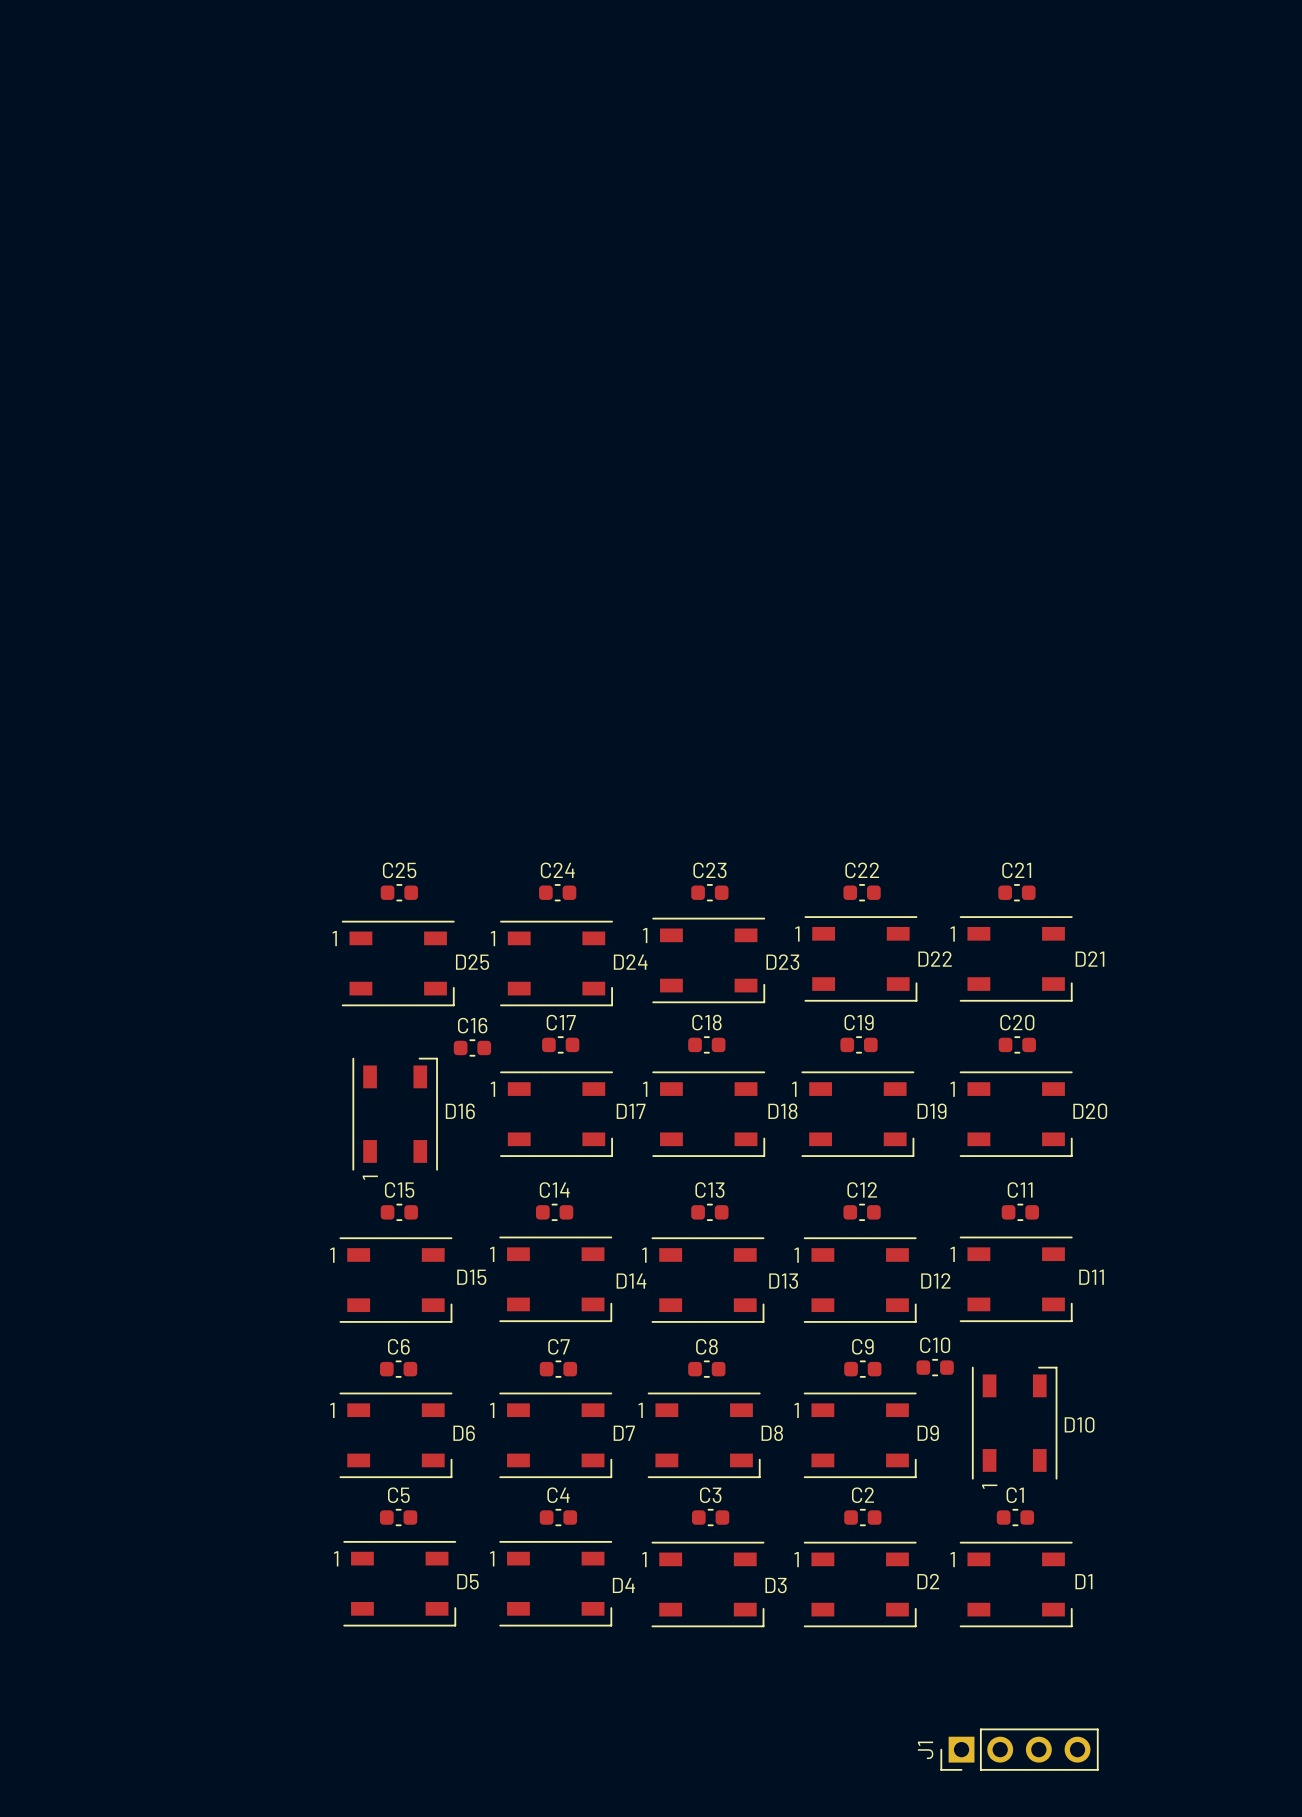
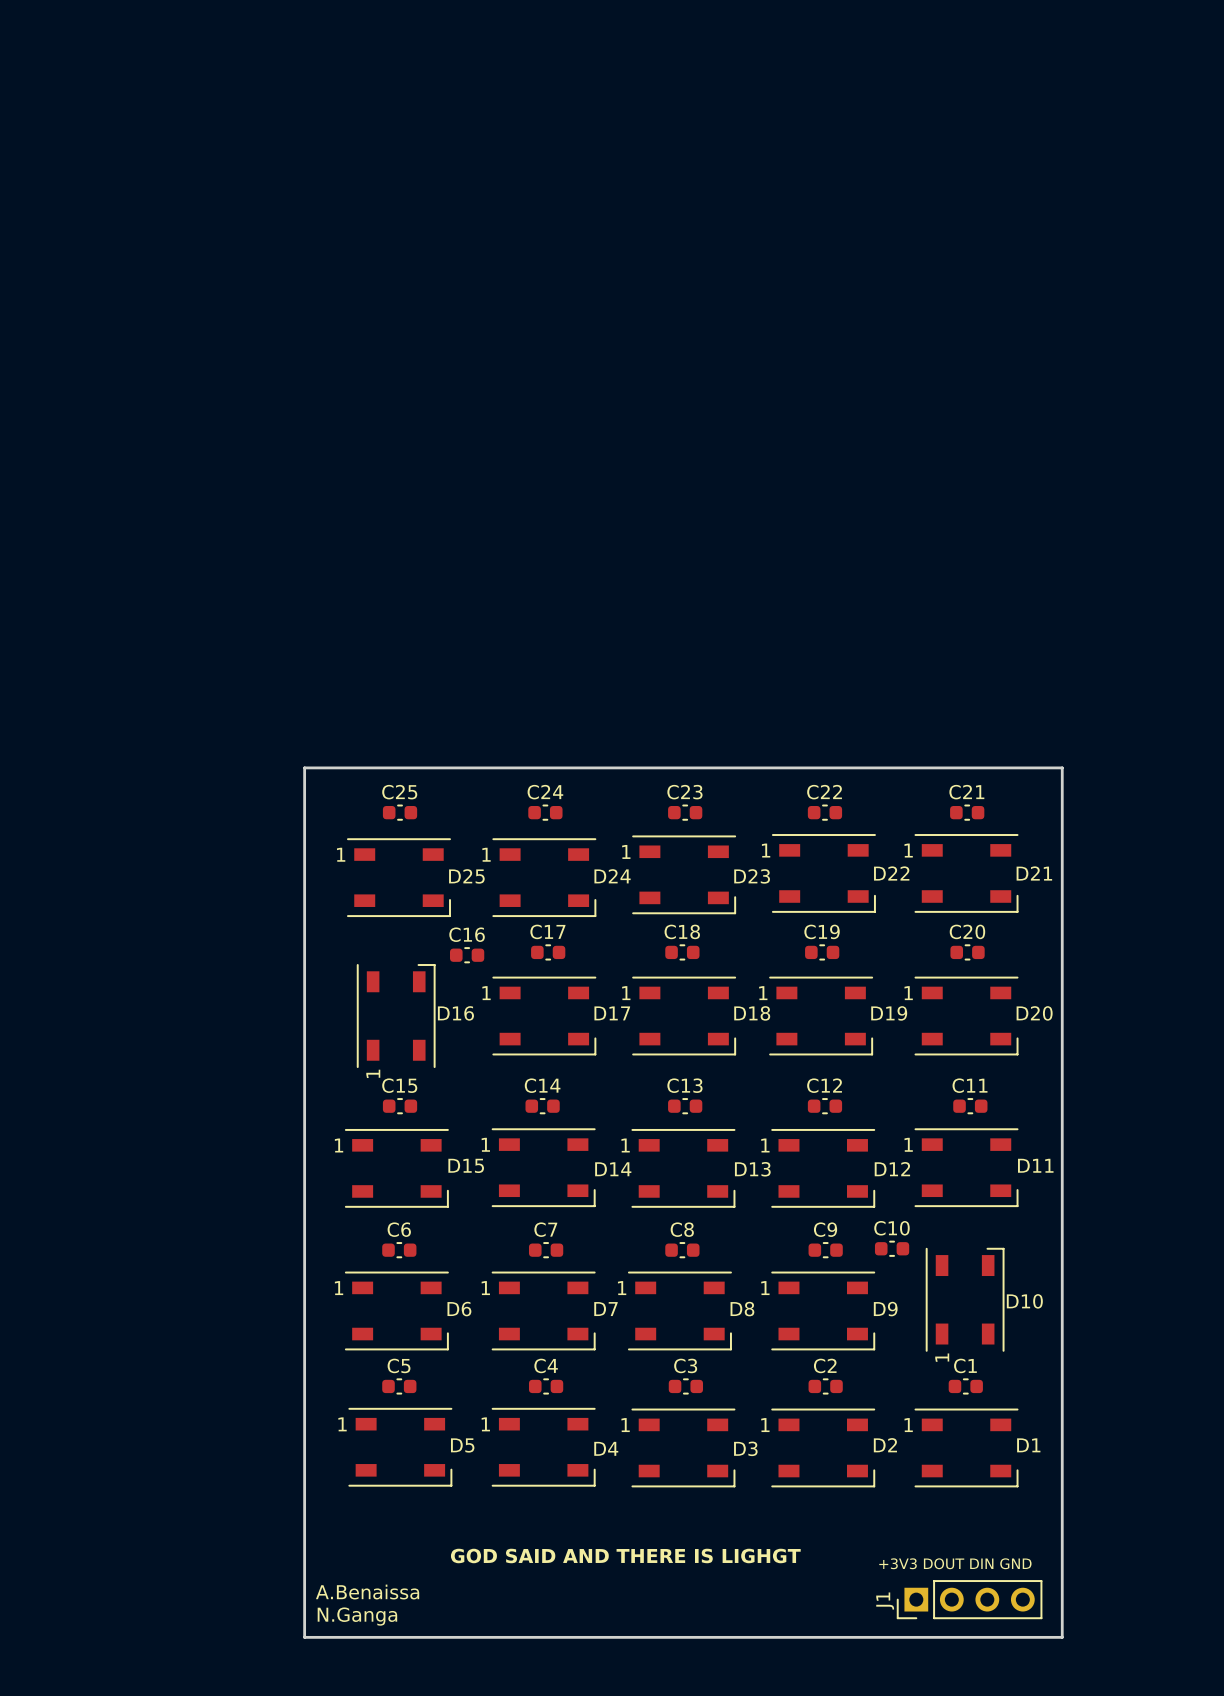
board edge: none -> (304, 767) (304, 1637) (1062, 1637) (1062, 767) (304, 767)
text: none -> GOD SAID AND THERE IS LIGHGT (625, 1555)
text: none -> +3V3 DOUT DIN GND (955, 1563)
text: none -> A.Benaissa (367, 1592)
text: none -> N.Ganga (357, 1616)

